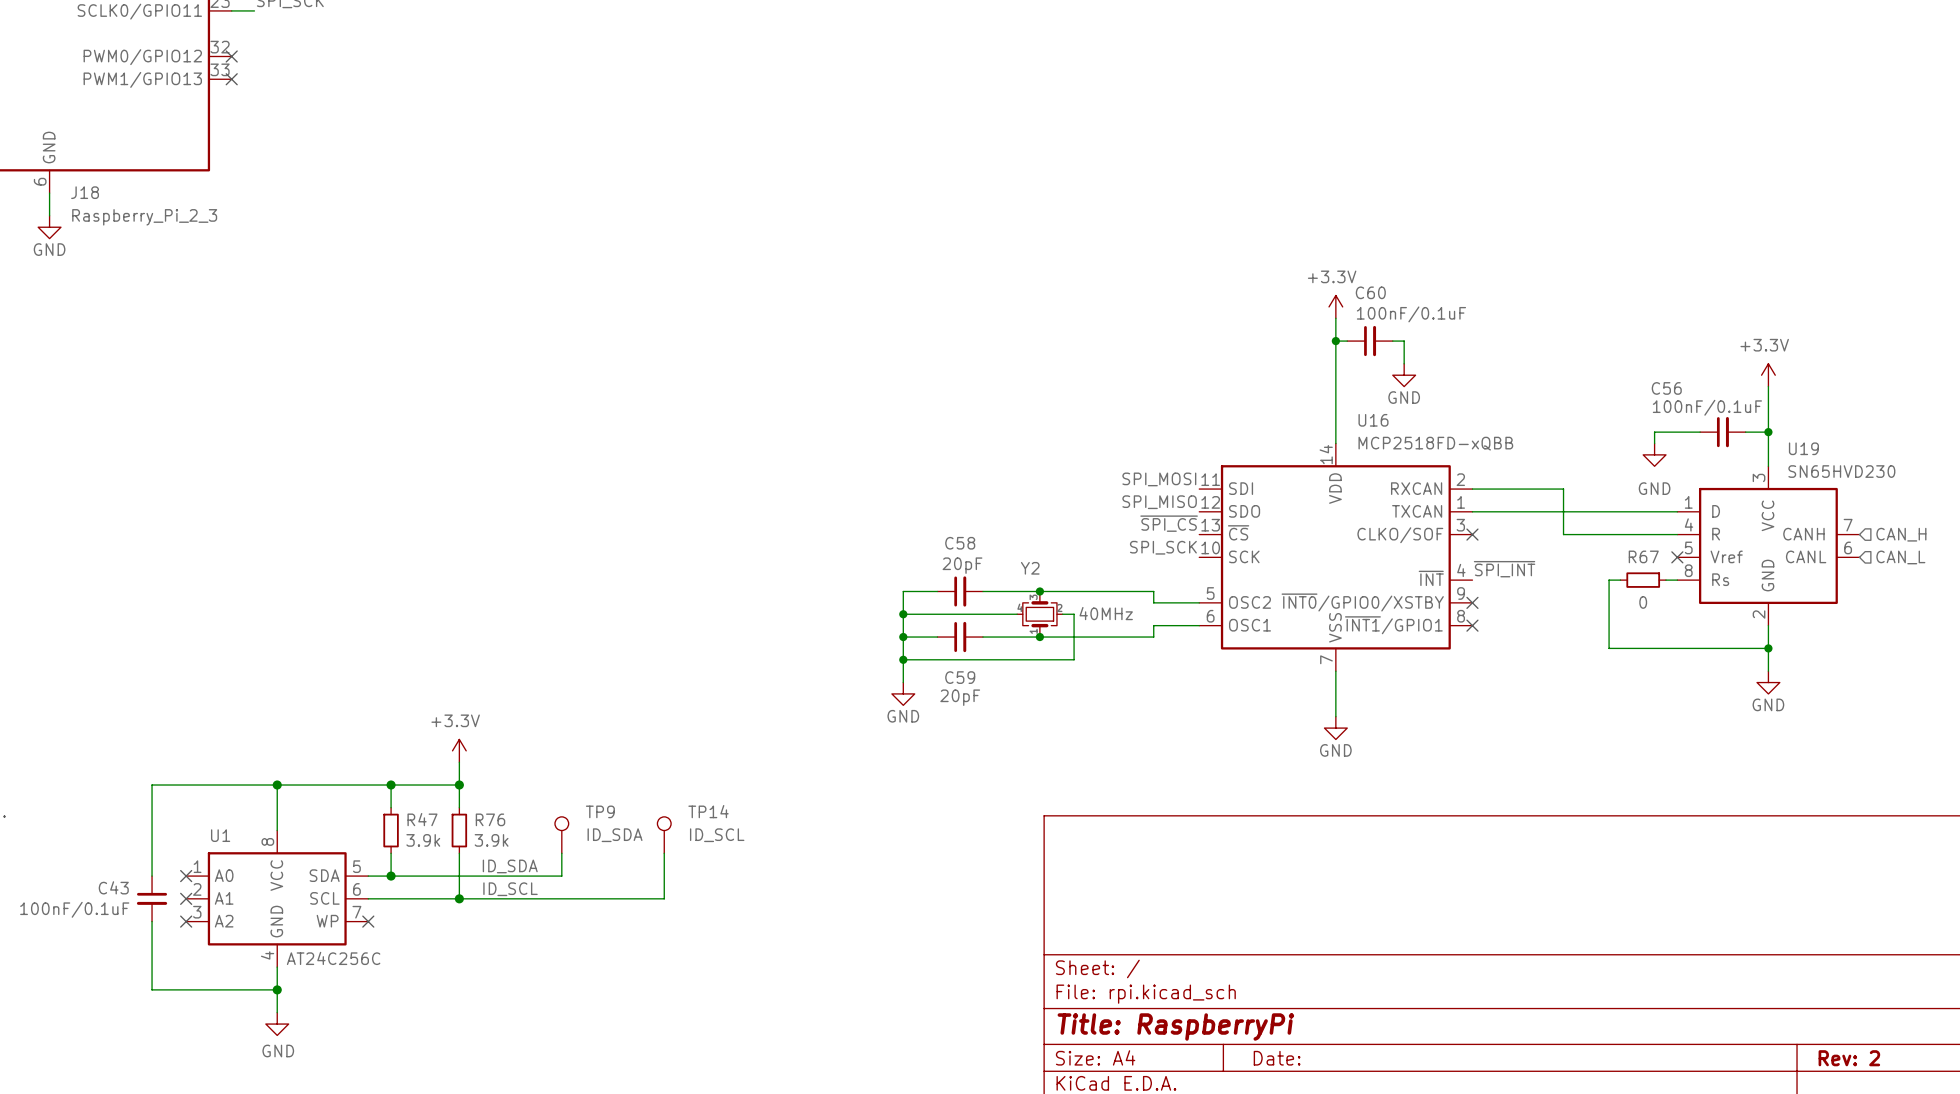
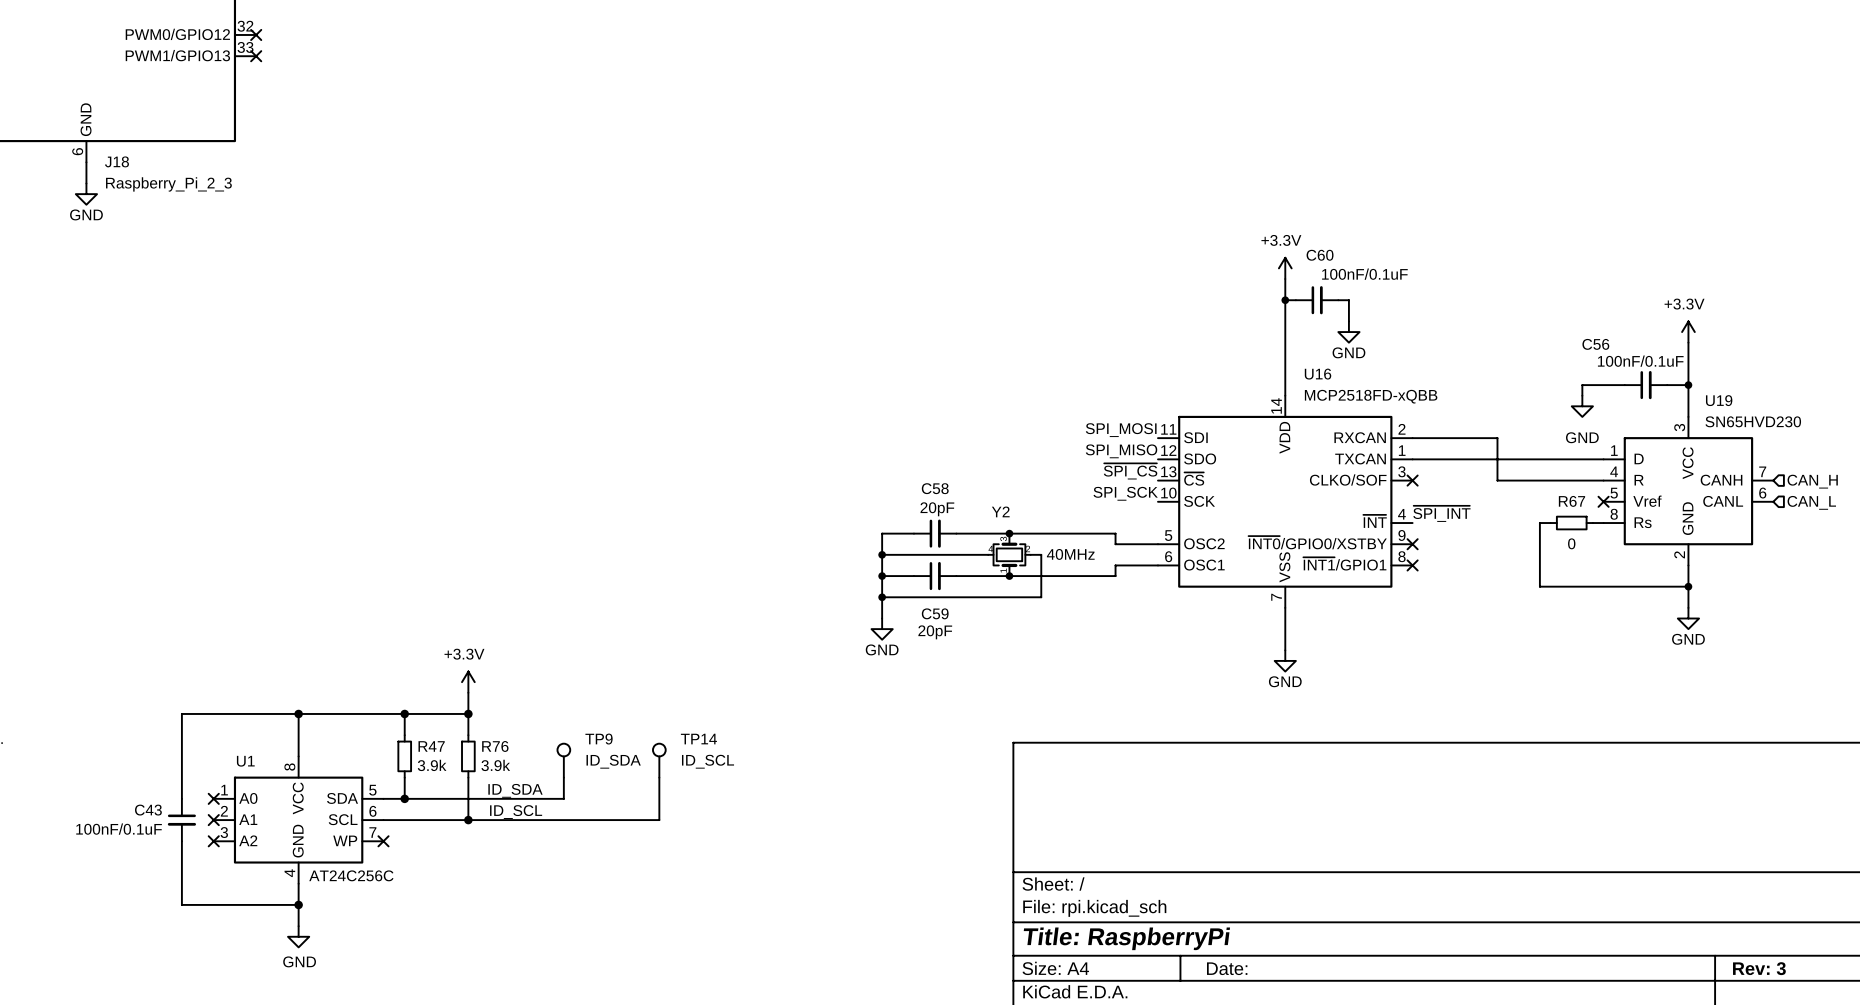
title block: Rev: 2 (1849, 1058) -> Rev: 3 (1759, 968)

